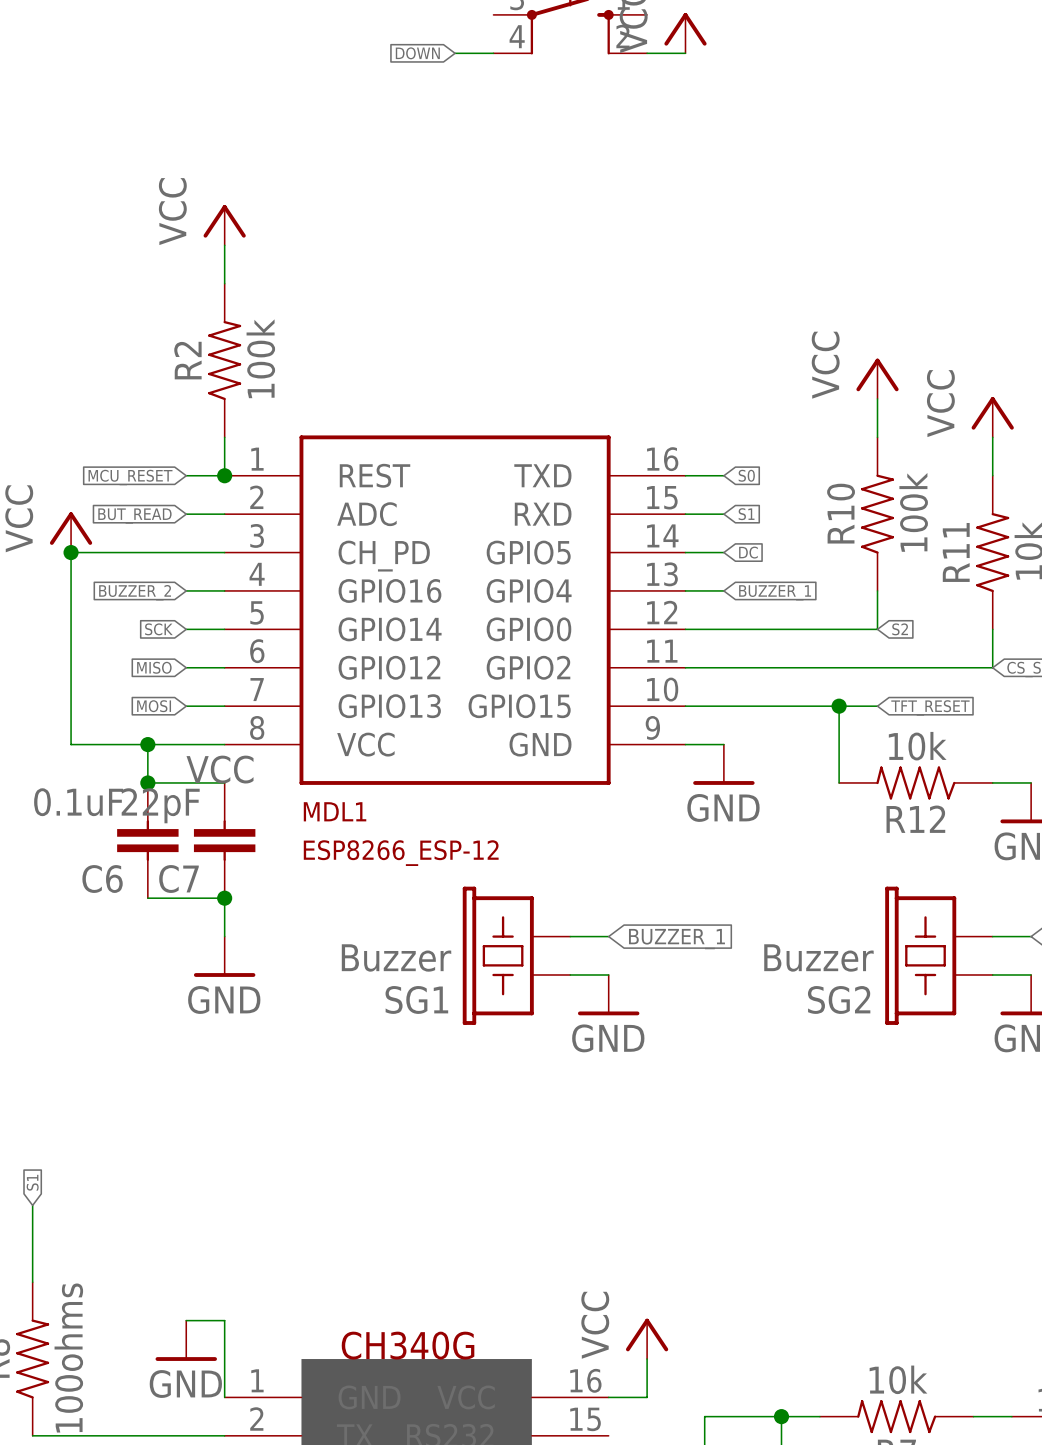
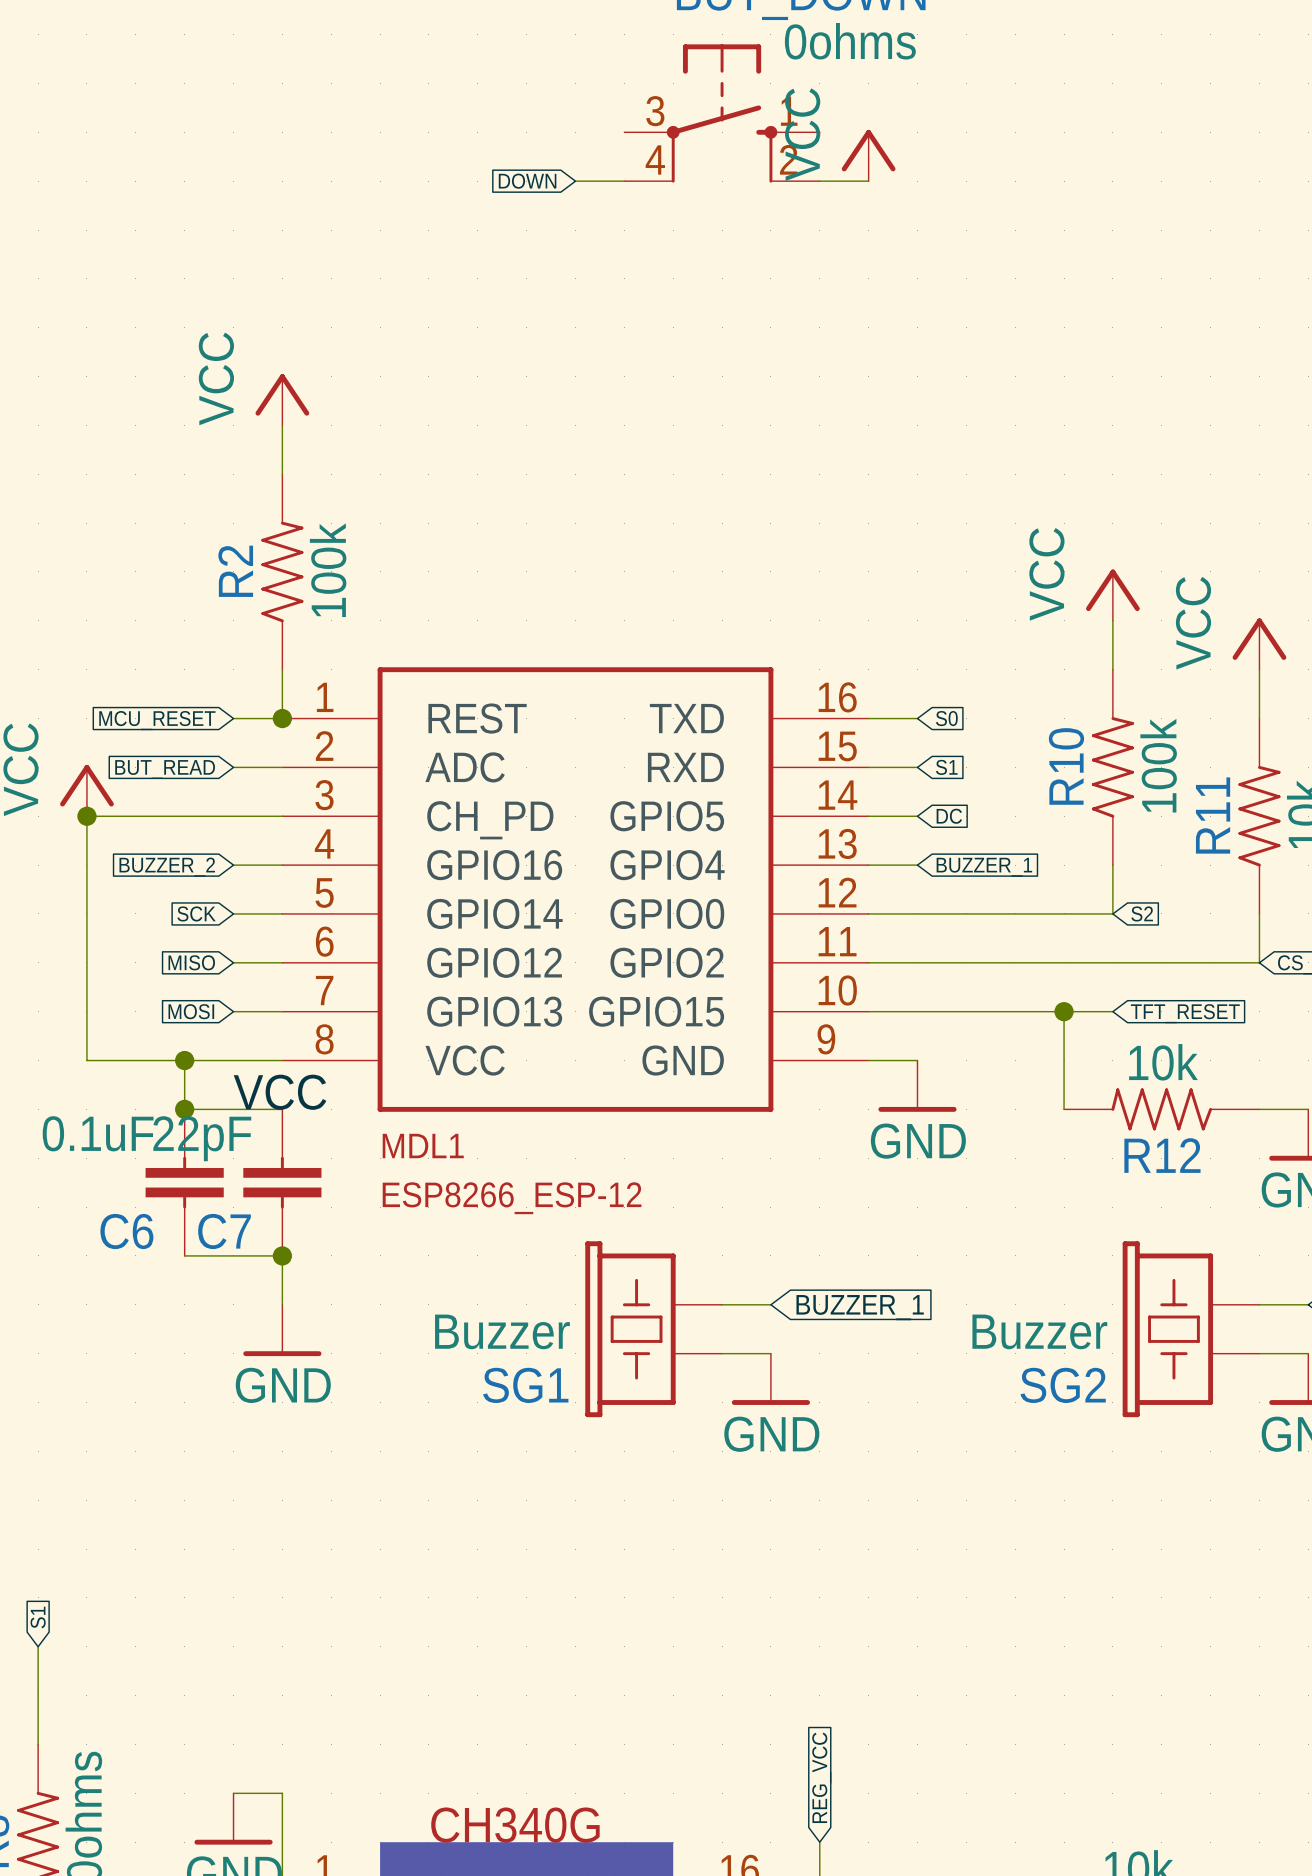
global label: none -> REG_VCC (821, 1777)
power symbol: VCC (647, 1338) -> none

